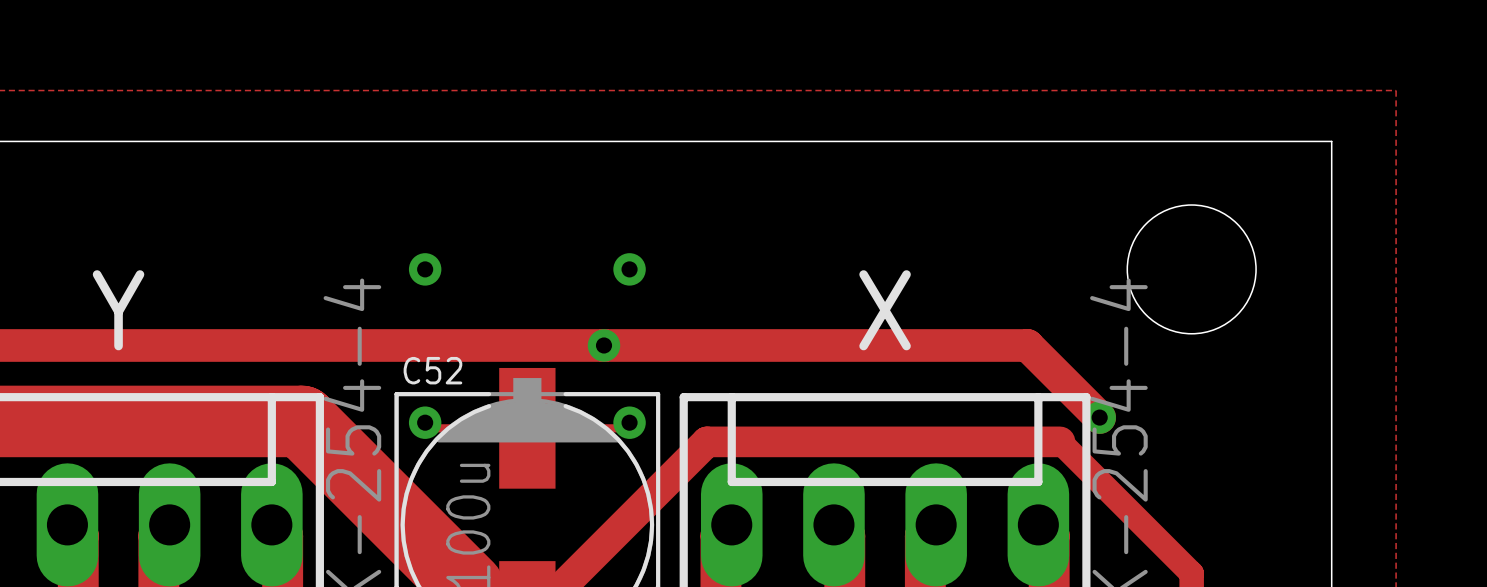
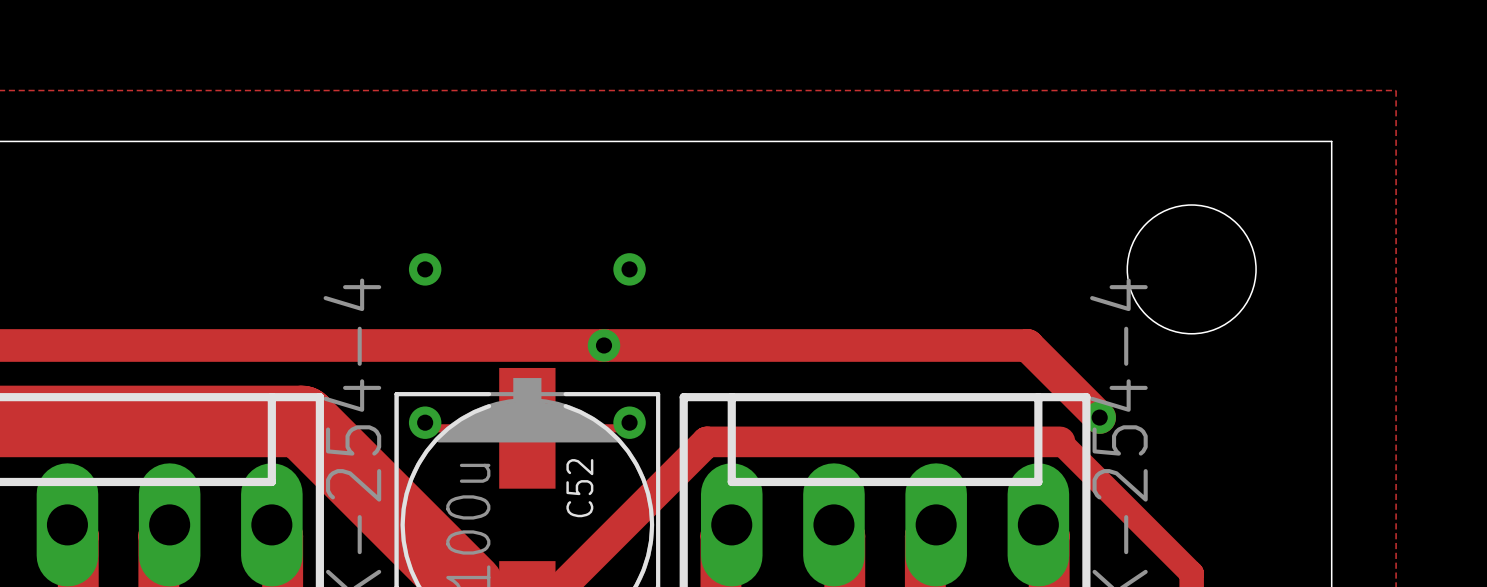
text: Y (118, 310) -> none
text: X (885, 310) -> none
C52 name rotation: 0° (432, 370) -> 90° counterclockwise (579, 488)
C52 name position: C52 (432, 370) -> C52 (579, 488)

